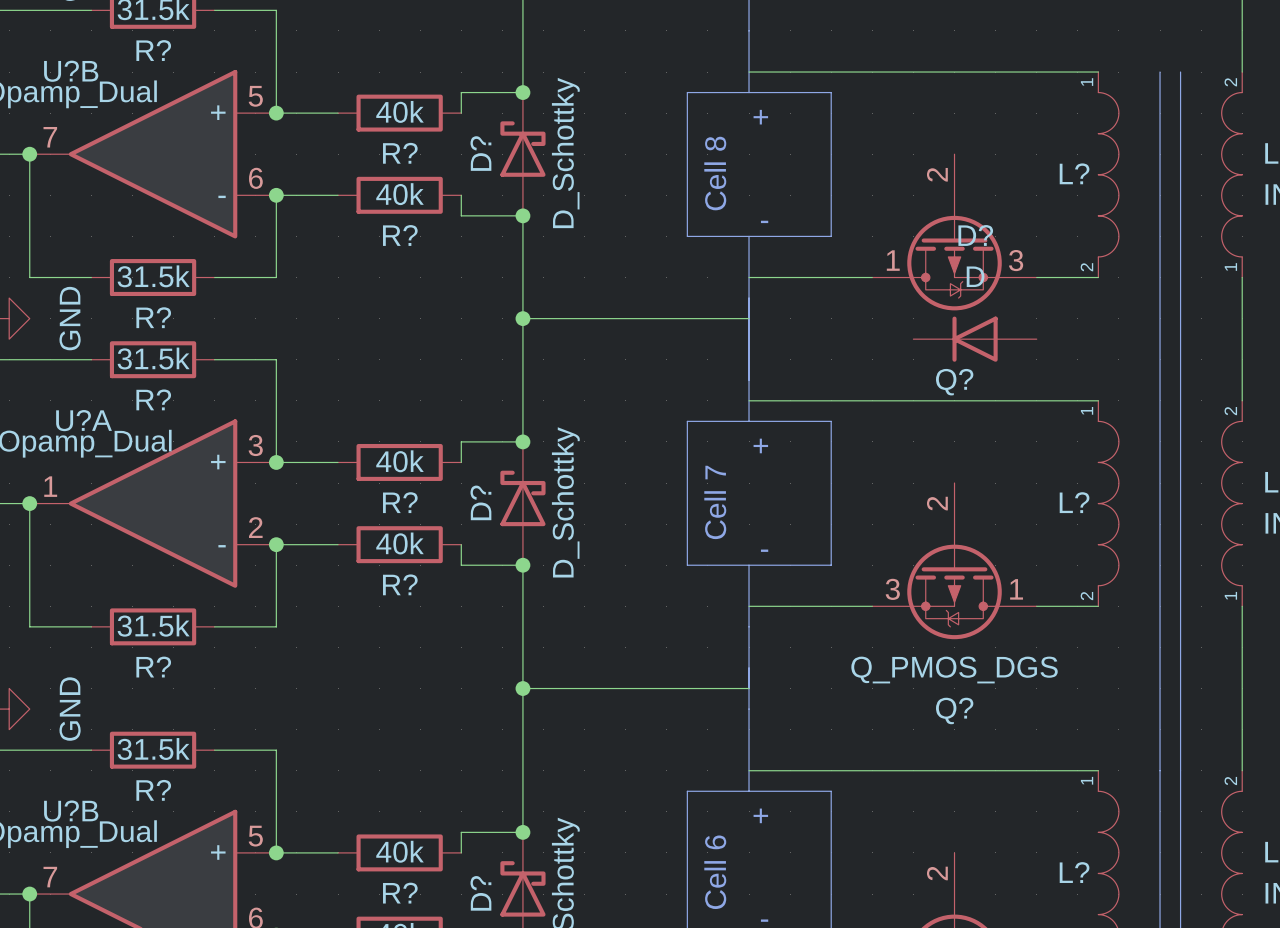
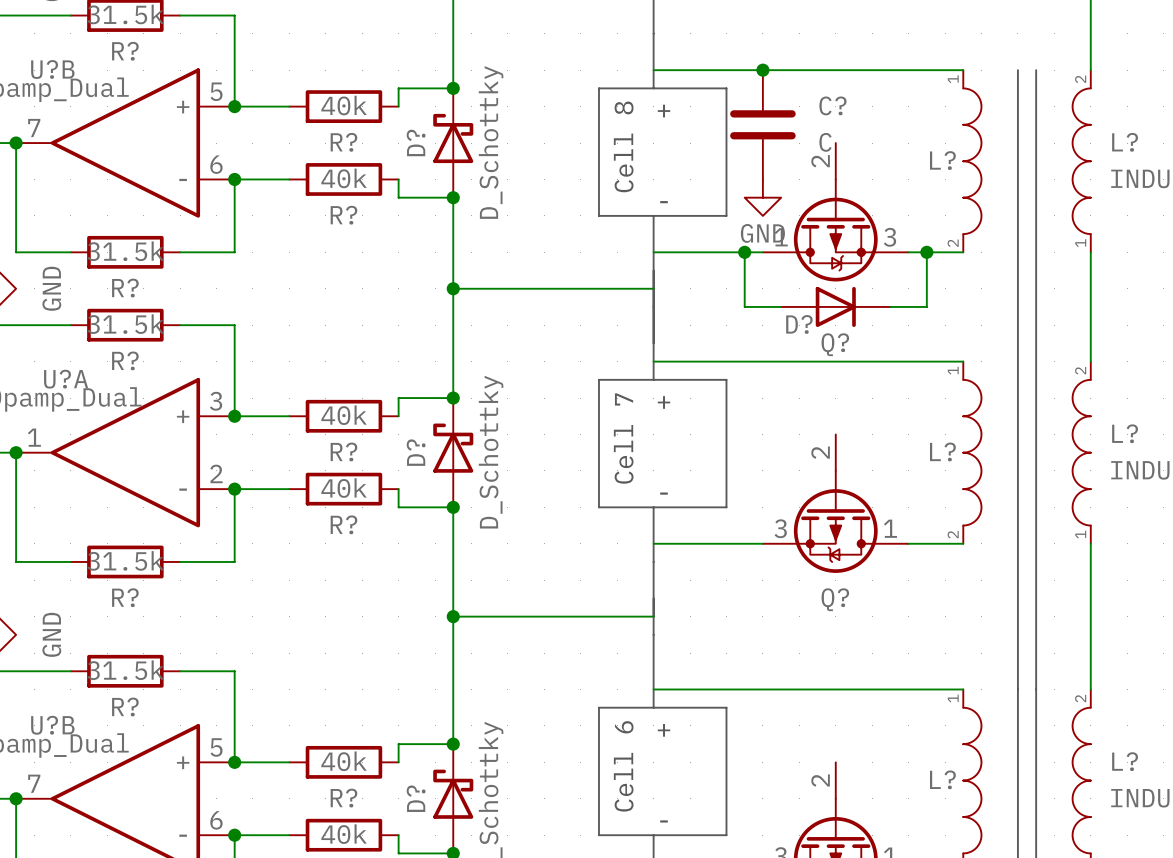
junction: none -> (762, 70)
C?: none -> C (762, 124)
power symbol: none -> GND (762, 197)
wire: none -> (744, 252) (744, 306) (781, 306)
junction: none -> (744, 252)
wire: none -> (926, 252) (926, 306) (890, 306)
junction: none -> (926, 252)
D?: none -> (835, 306)
D?: D (975, 339) -> none
Q? value: Q_PMOS_DGS (954, 670) -> none
Q? name position: Q? (954, 710) -> Q? (835, 599)

